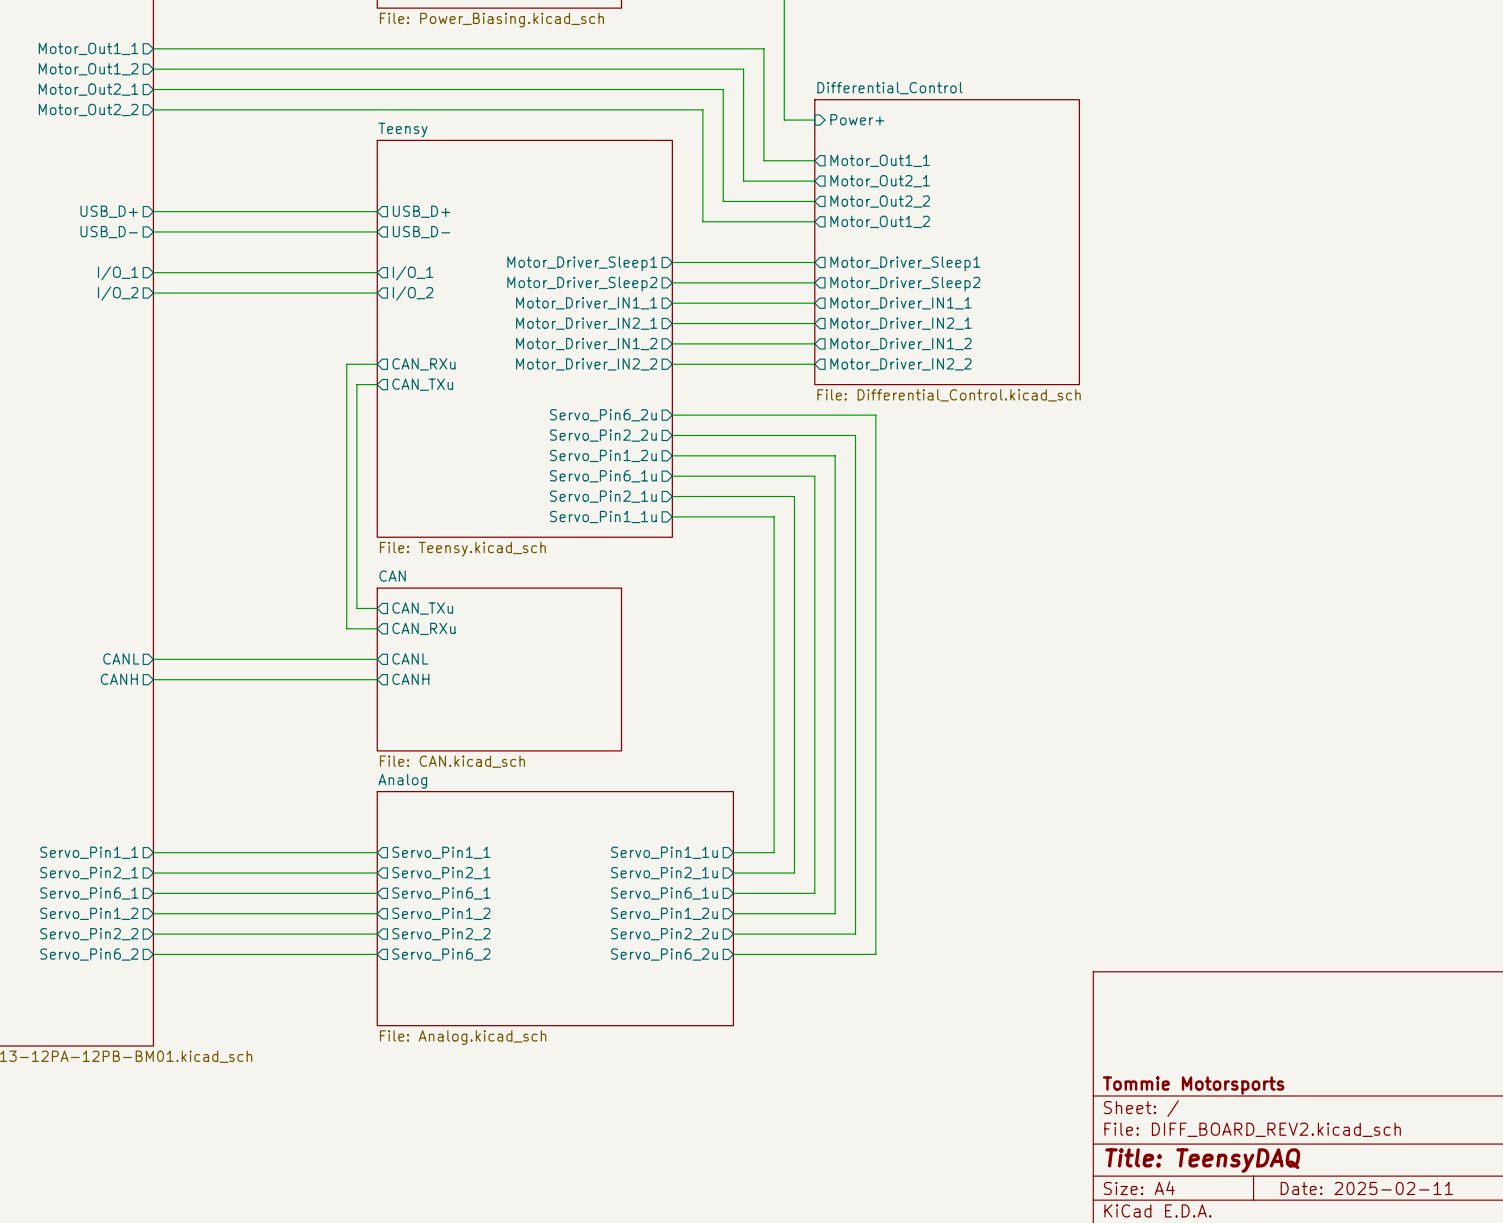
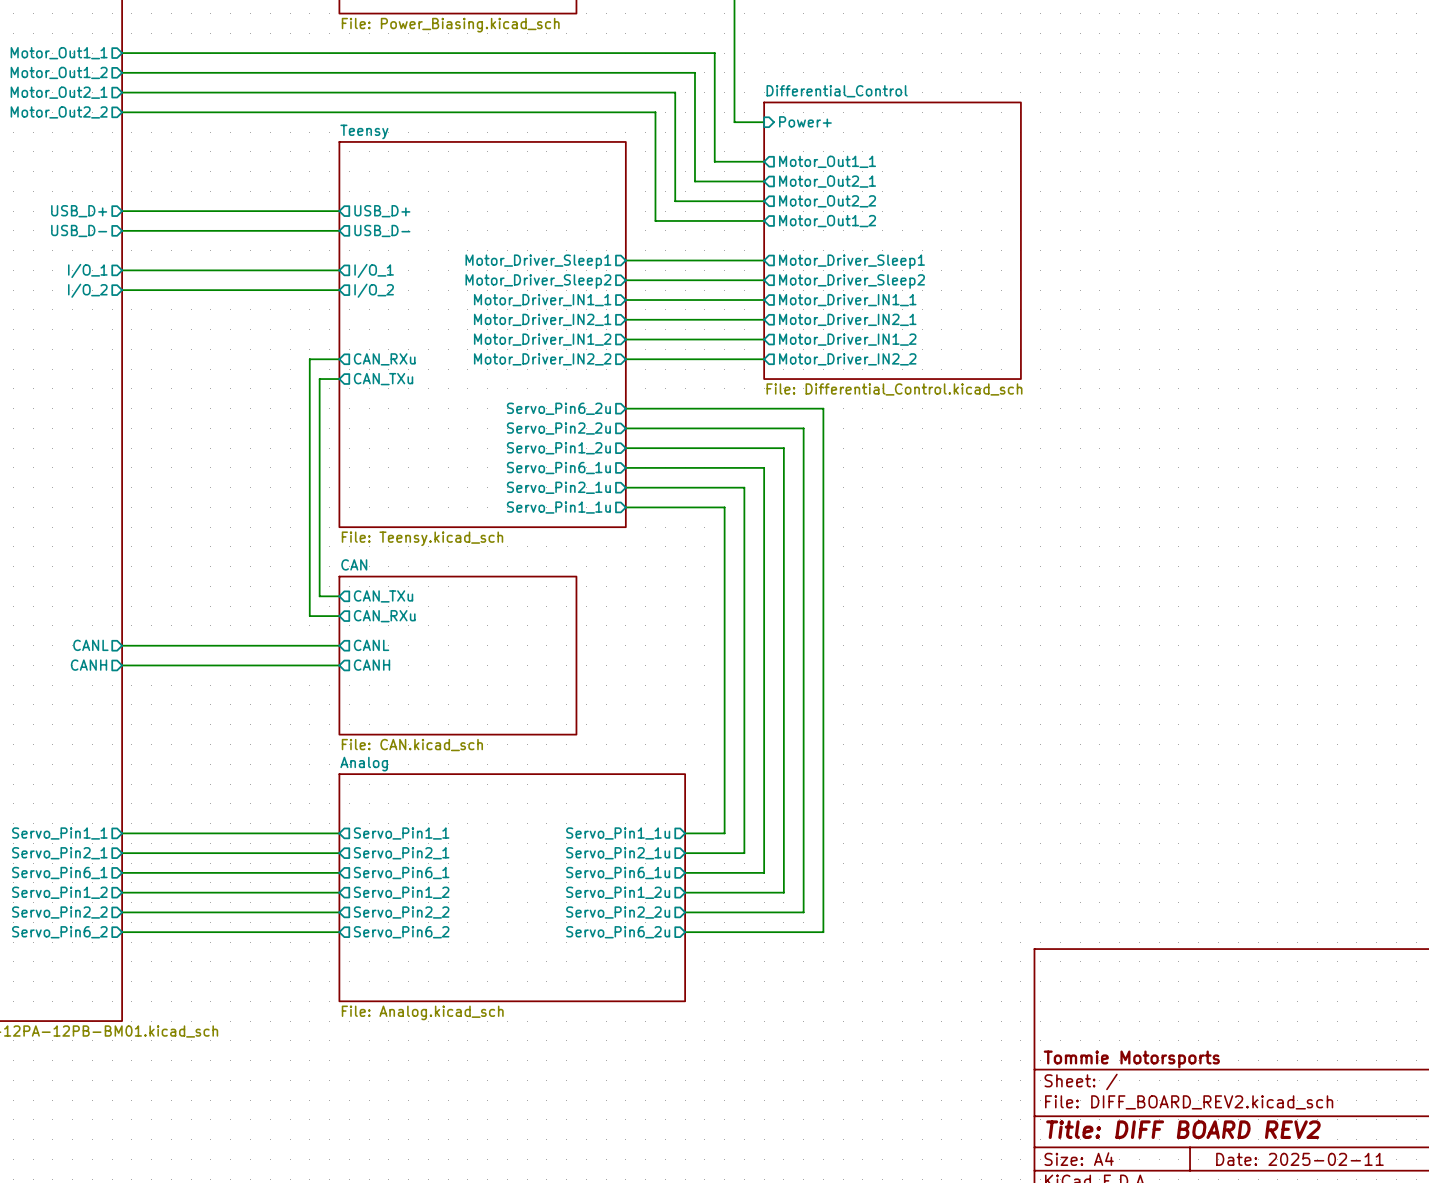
title block: Title: TeensyDAQ (1202, 1160) -> Title: DIFF BOARD REV2 (1183, 1129)

